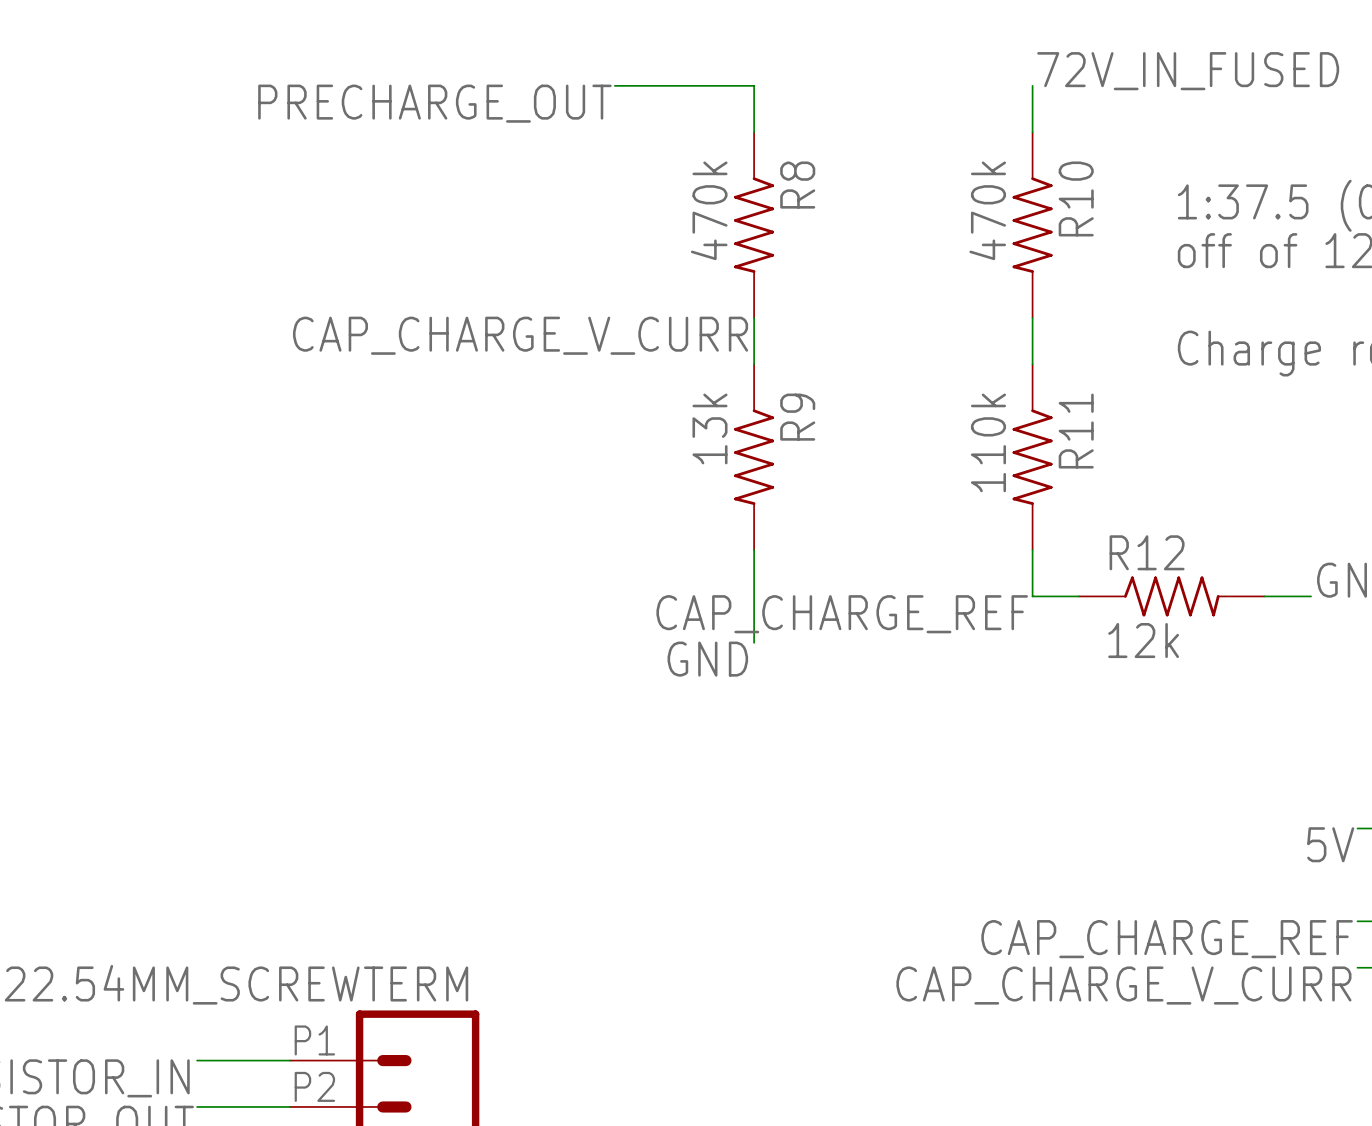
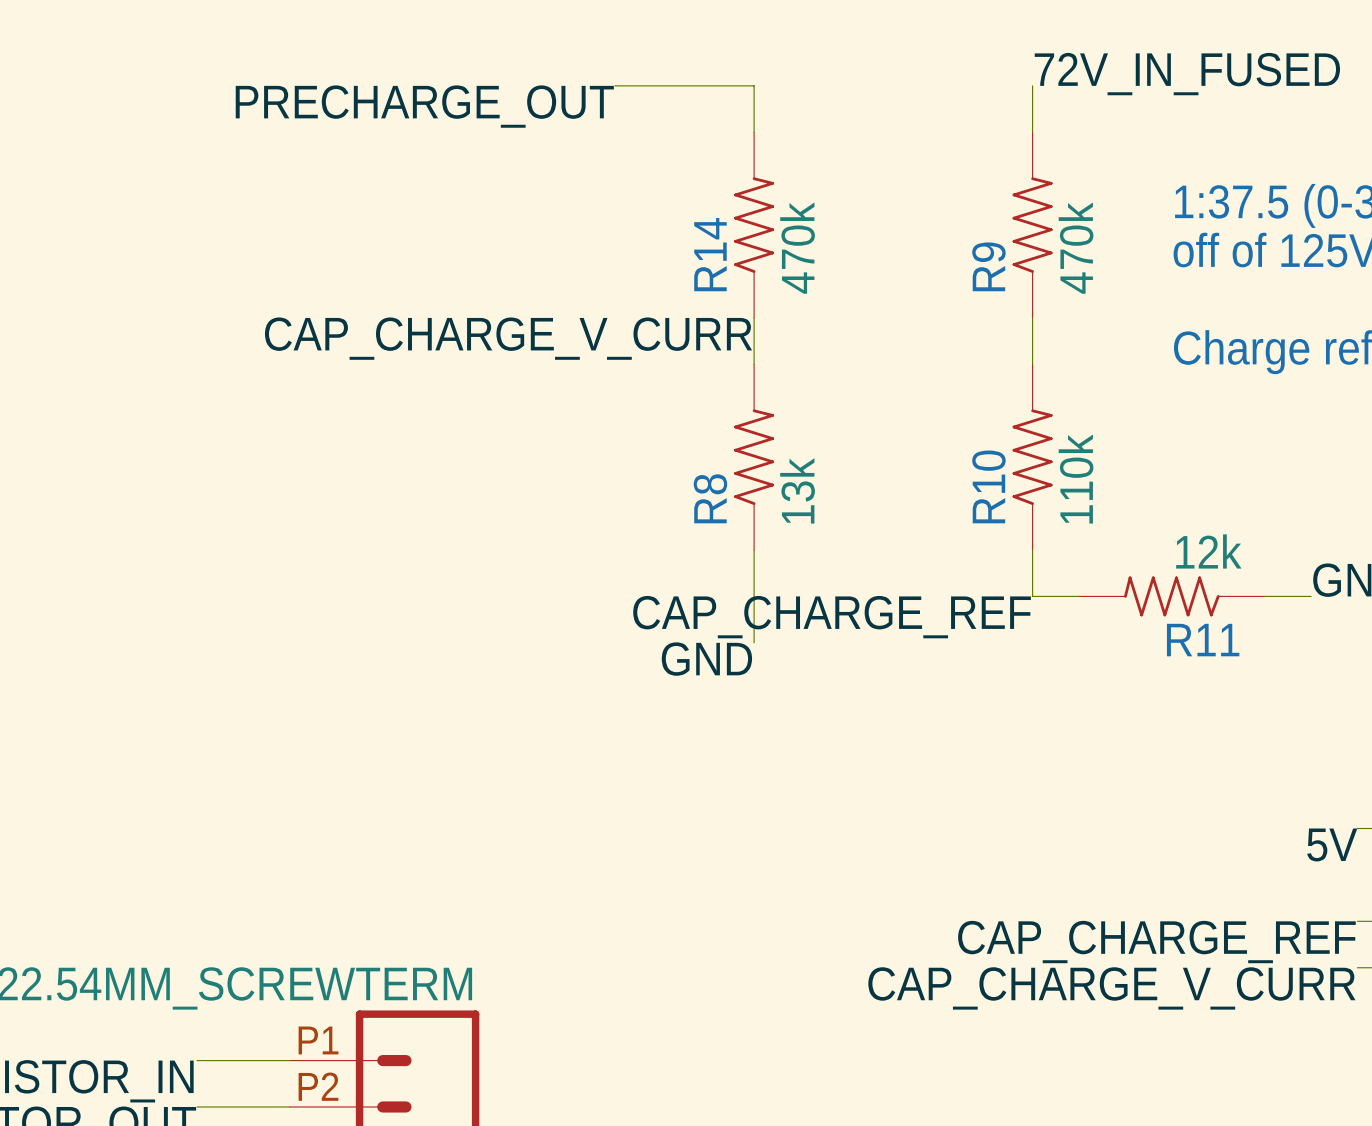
R8 value: 470k (709, 210) -> 13k (797, 490)
R10 value: 470k (987, 210) -> 110k (1076, 479)
R8 rotation: 0° (754, 225) -> 180° (754, 457)
R8 position: (754, 225) -> (754, 457)
R14: none -> 470k (754, 225)
R10 rotation: 0° (1032, 225) -> 180° (1032, 457)
R10 position: (1032, 225) -> (1032, 457)
R9 value: 13k (709, 428) -> 470k (1076, 248)
R11 value: 110k (988, 442) -> 12k (1208, 551)
R9 rotation: 0° (754, 457) -> 180° (1032, 225)
R9 position: (754, 457) -> (1032, 225)
R11 rotation: 0° (1032, 457) -> 90° clockwise (1171, 596)
R11 position: (1032, 457) -> (1171, 596)
R12: 12k (1171, 596) -> none

